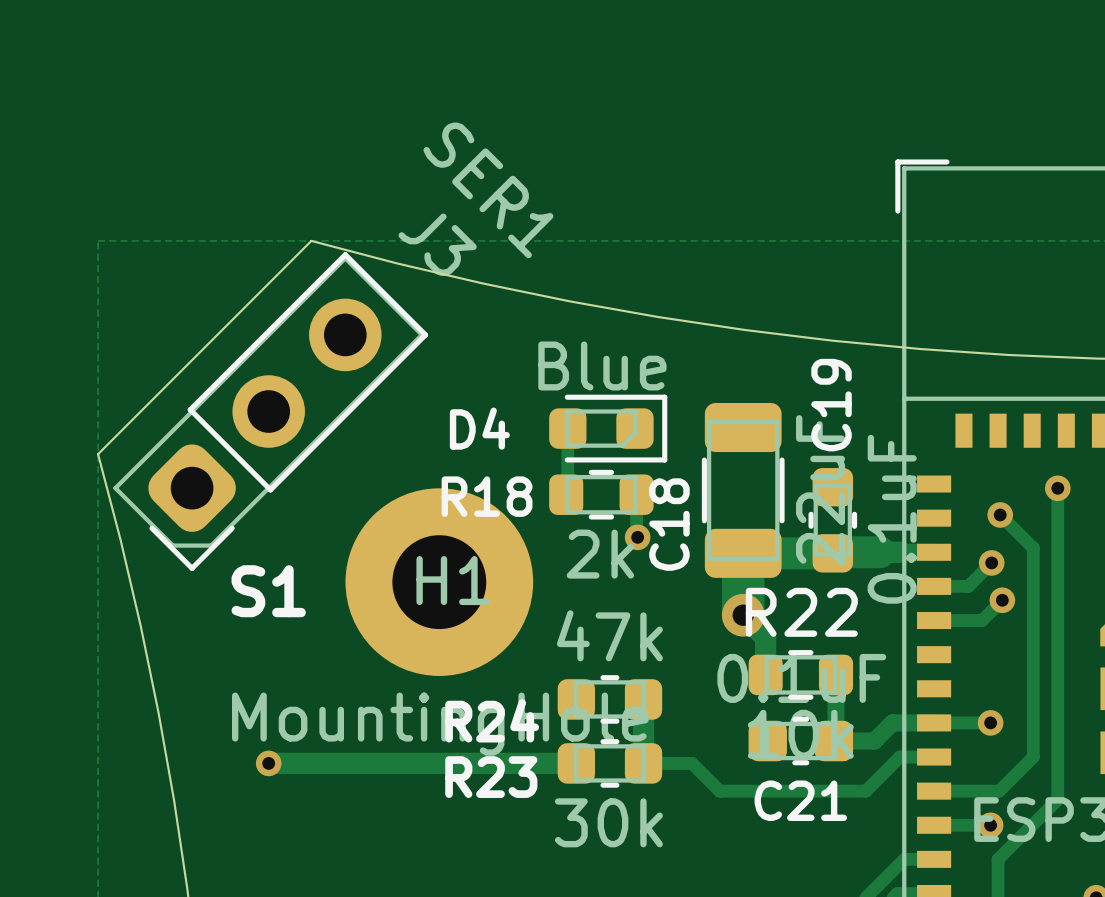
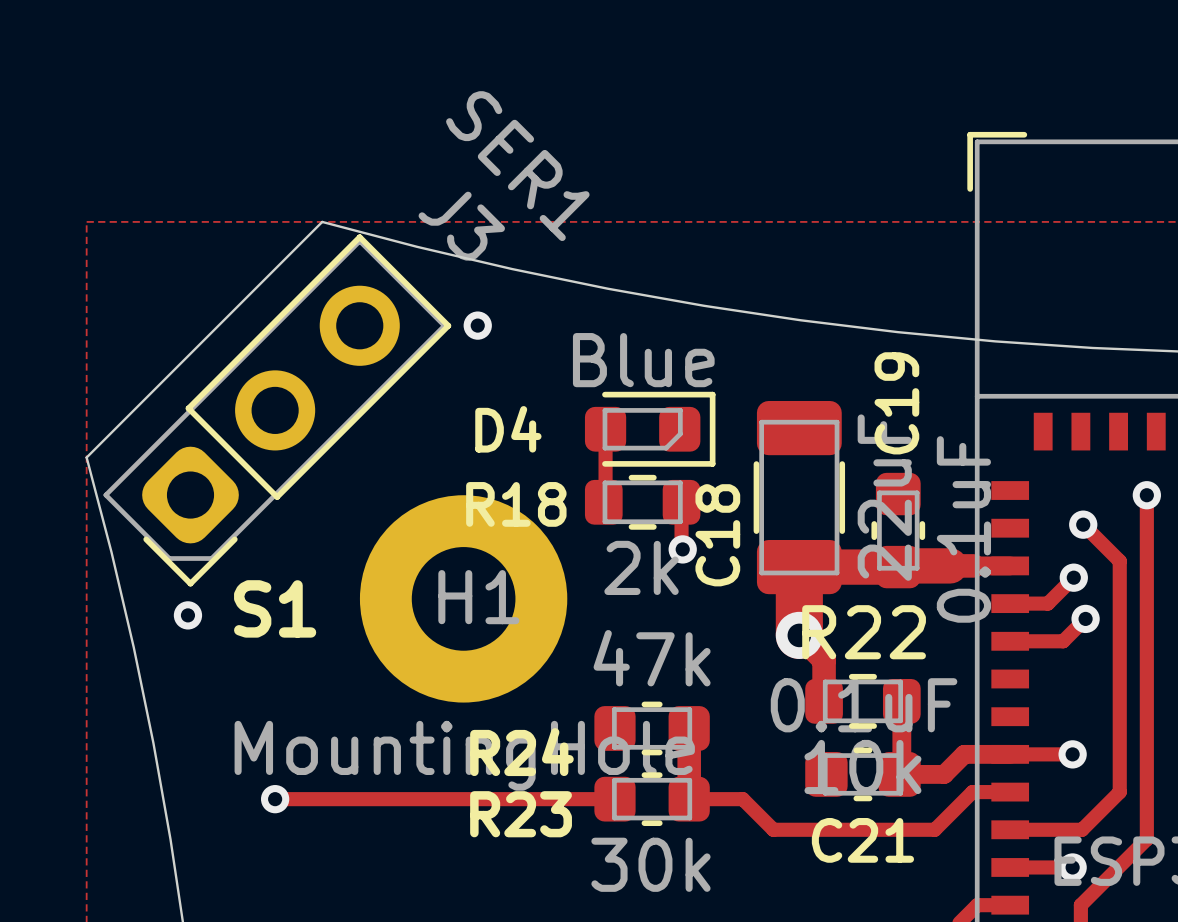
via: none -> (477, 325)
via: none -> (187, 615)
track width: thick (268, 763) (576, 763) -> thin (275, 799) (614, 799)

